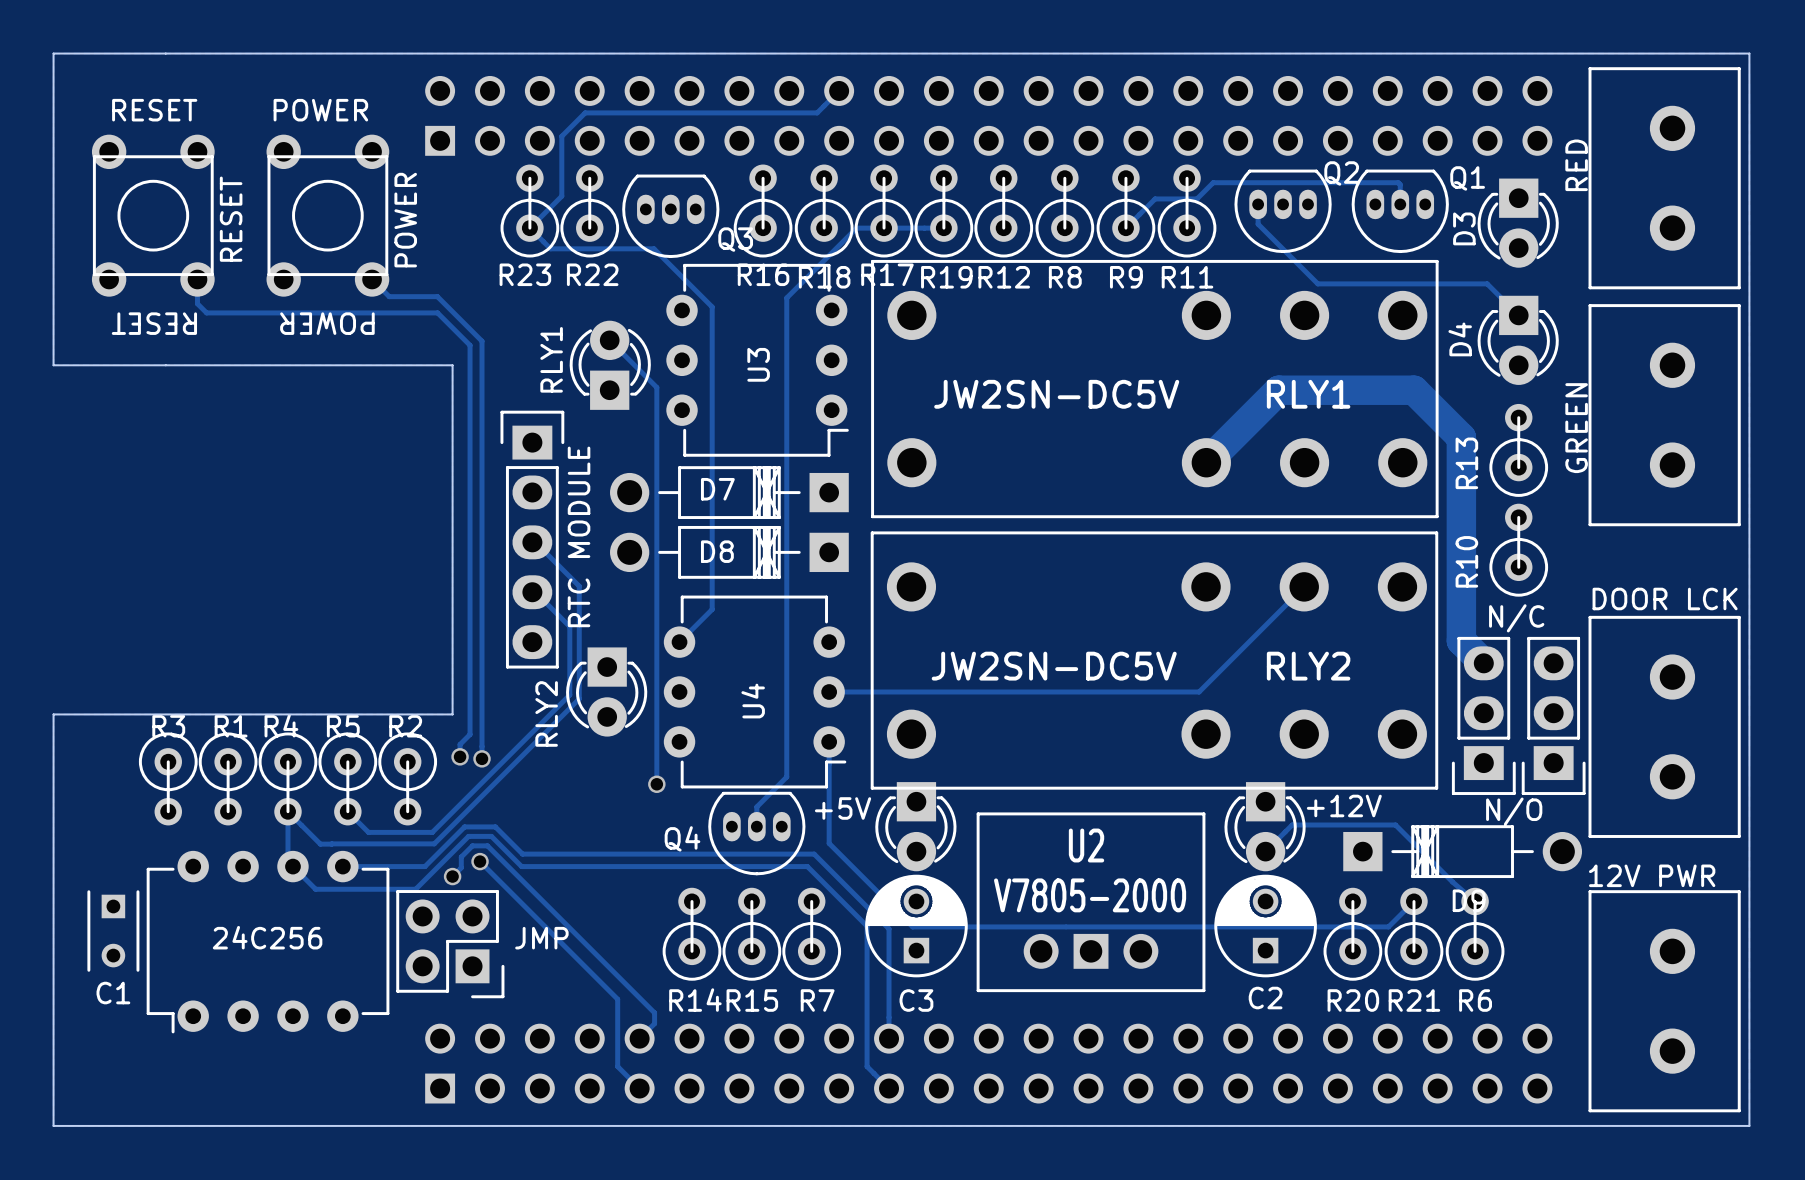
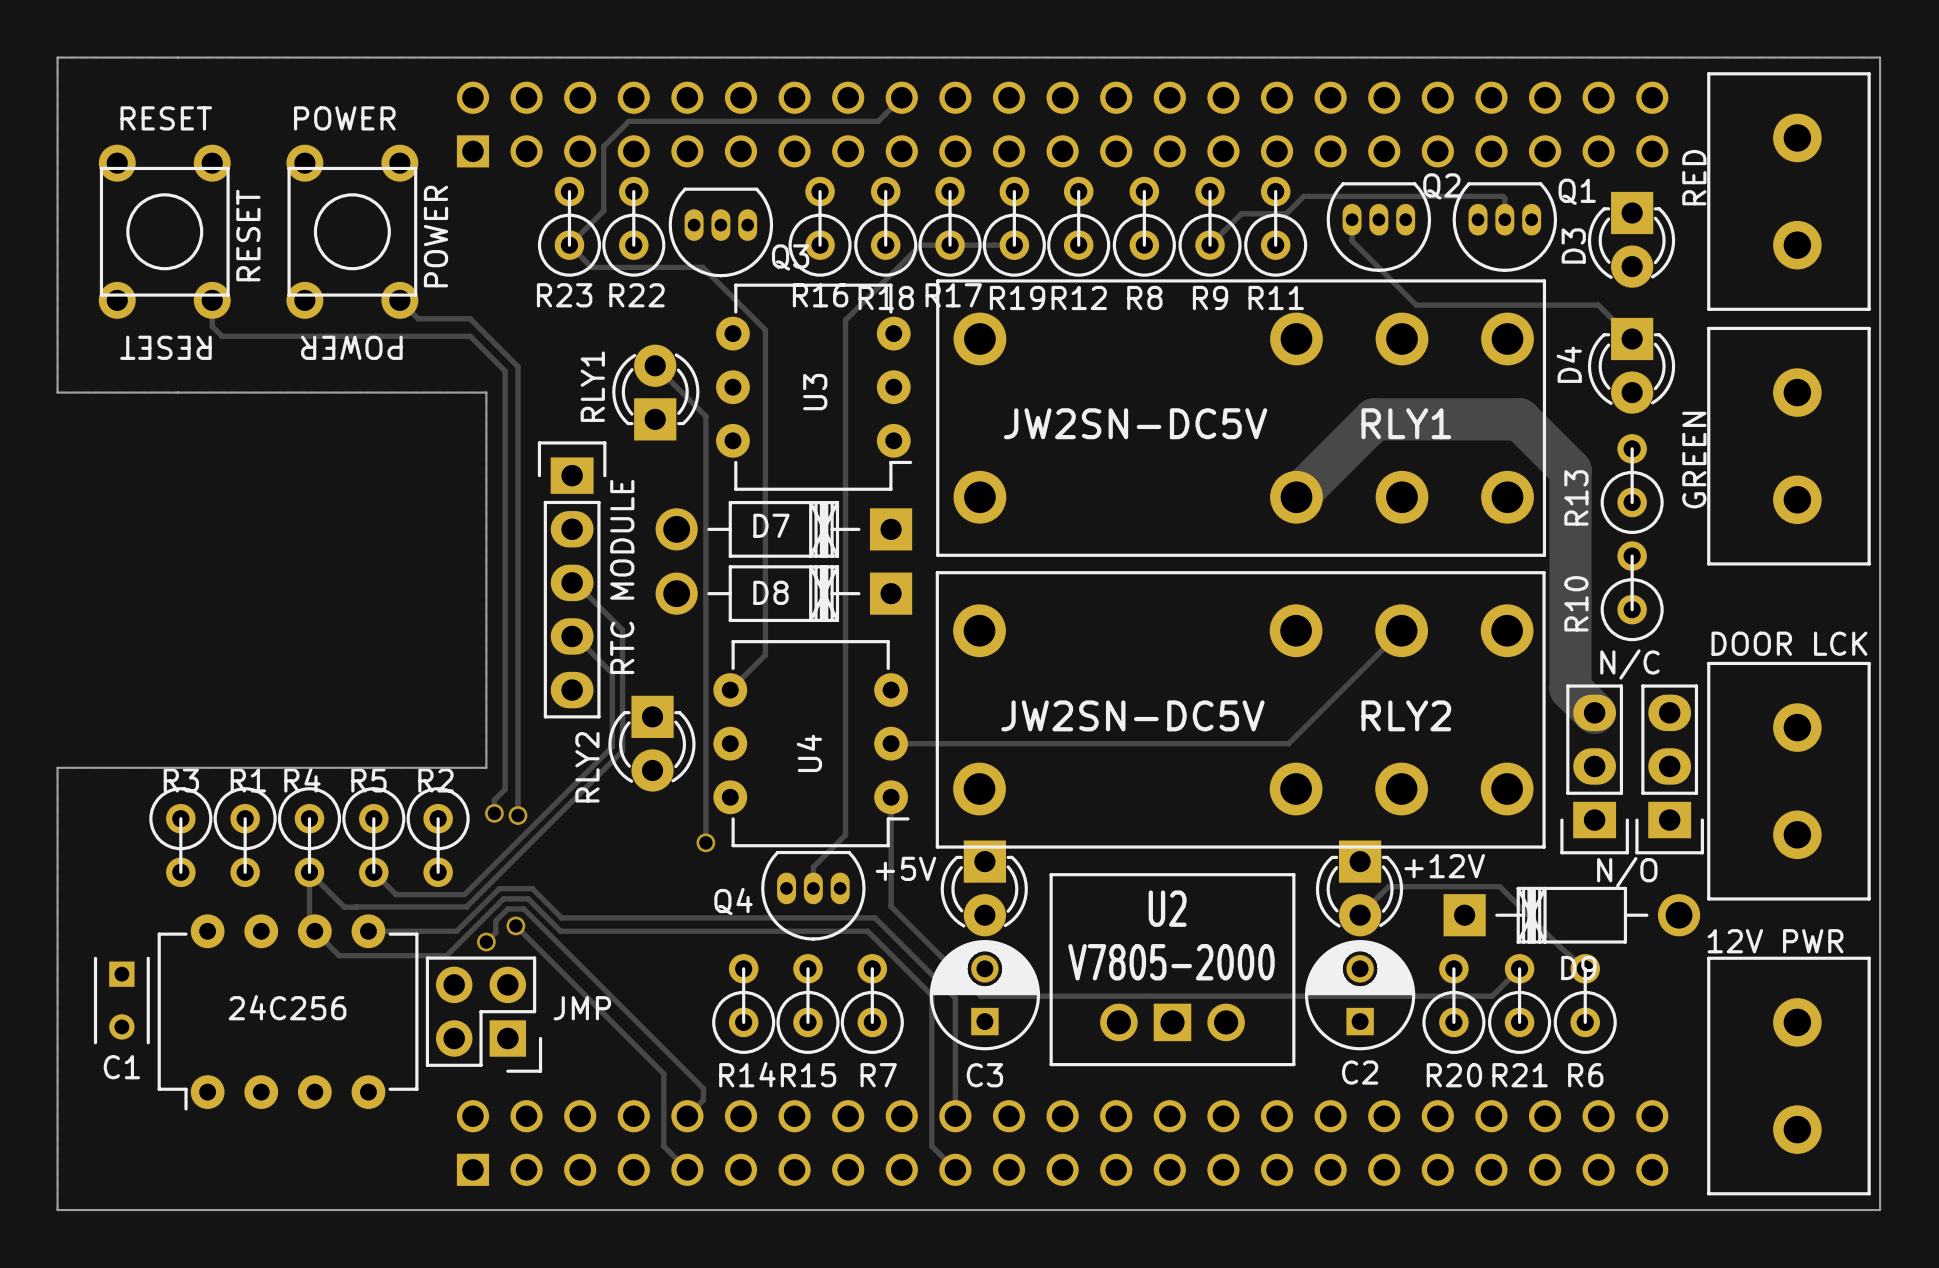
track width: thin (1206, 462) (1278, 390) (1413, 390) (1461, 437) (1461, 640) (1483, 663) -> thick (1296, 497) (1374, 419) (1519, 419) (1570, 470) (1570, 688) (1594, 712)

